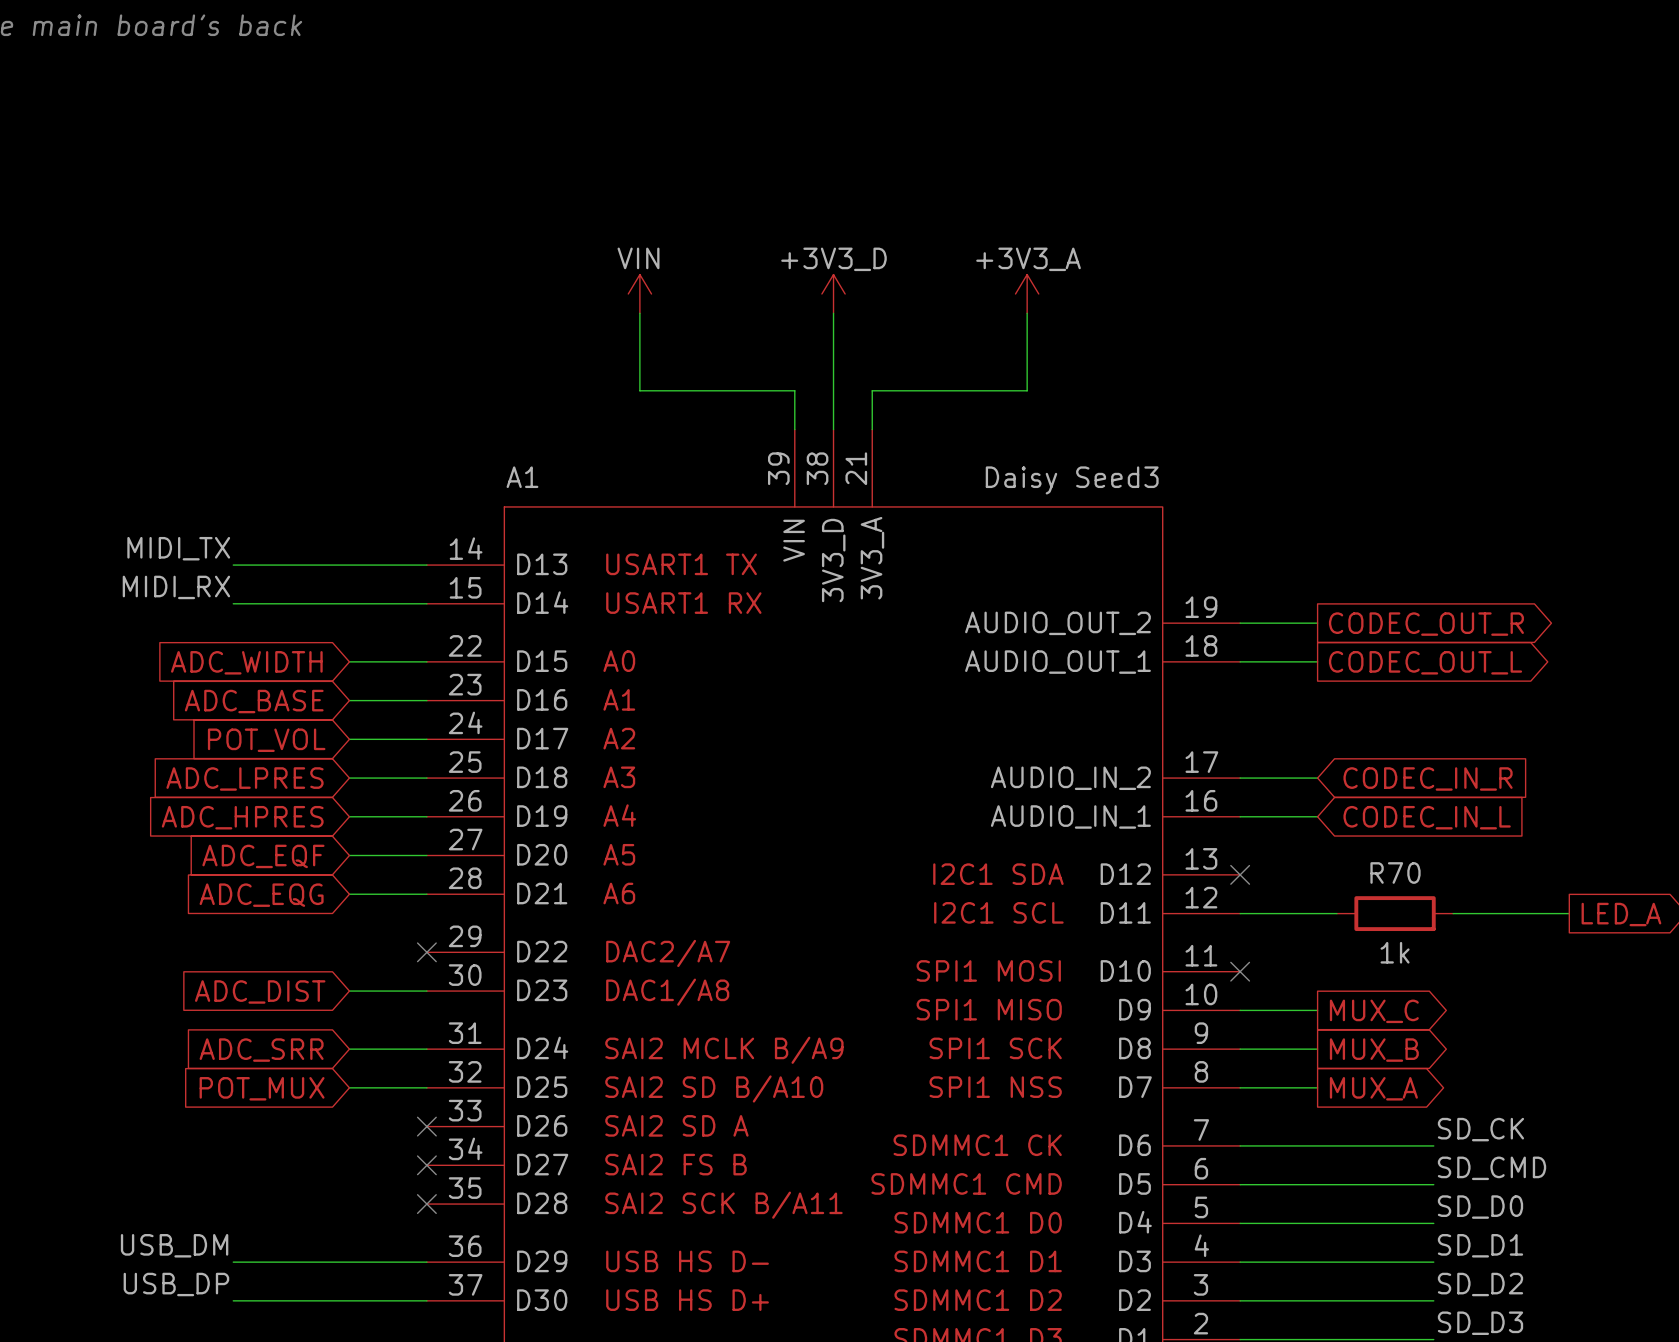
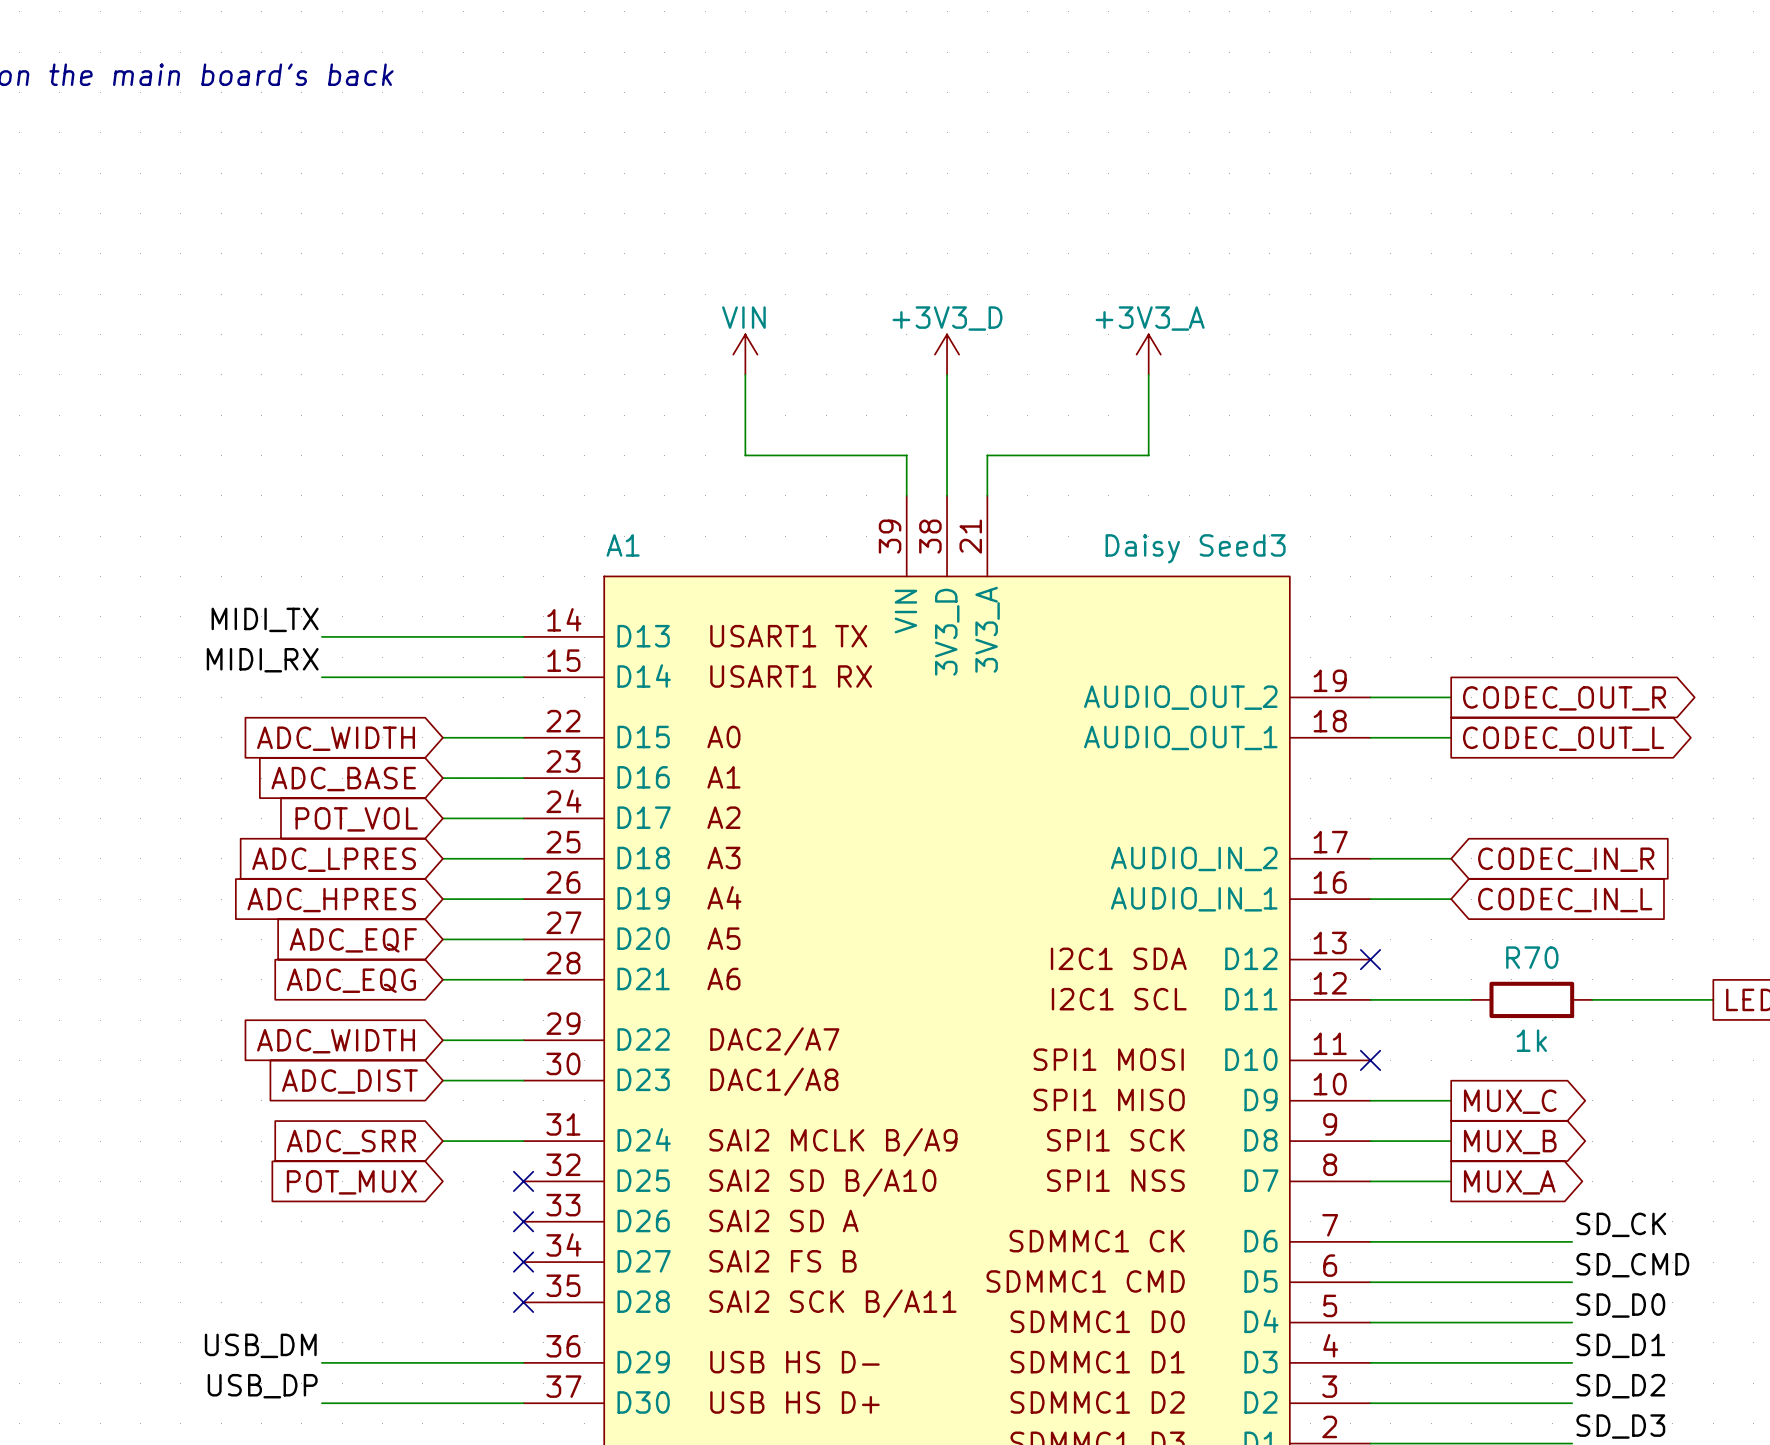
no-connect mark: (426, 952) -> none
global label: none -> ADC_WIDTH (336, 1041)
wire: (349, 1087) (426, 1087) -> (442, 1040) (523, 1040)
no-connect mark: none -> (523, 1181)

